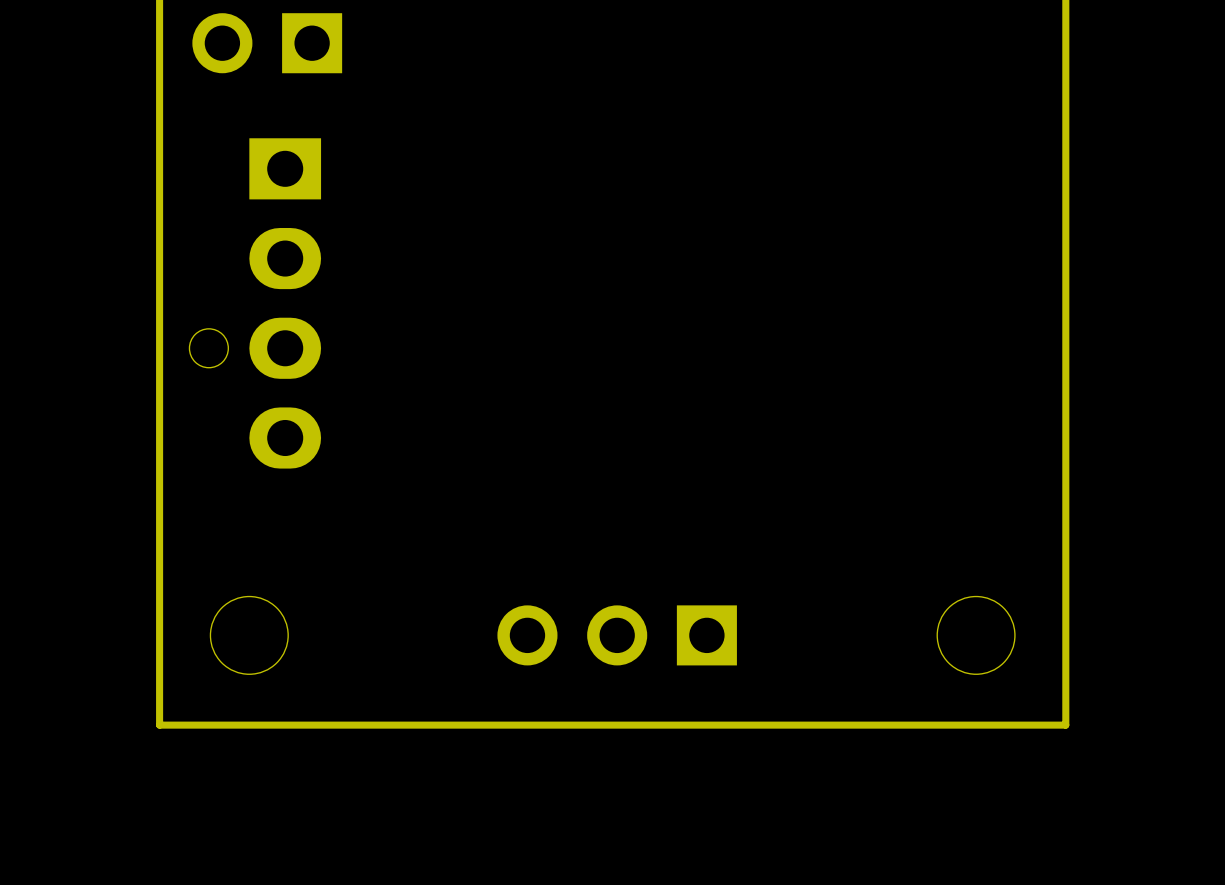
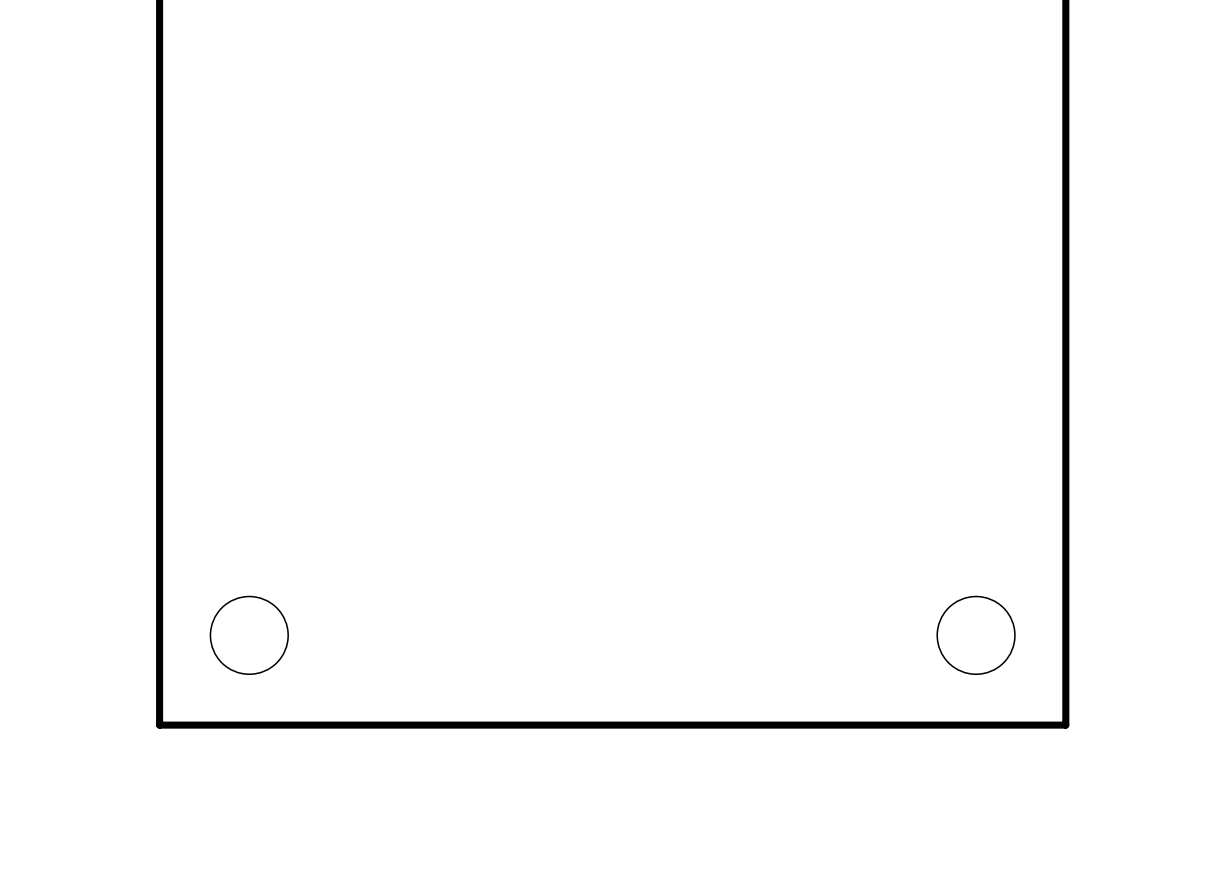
part: (267, 43) -> none
part: (255, 303) -> none
part: (617, 635) -> none

